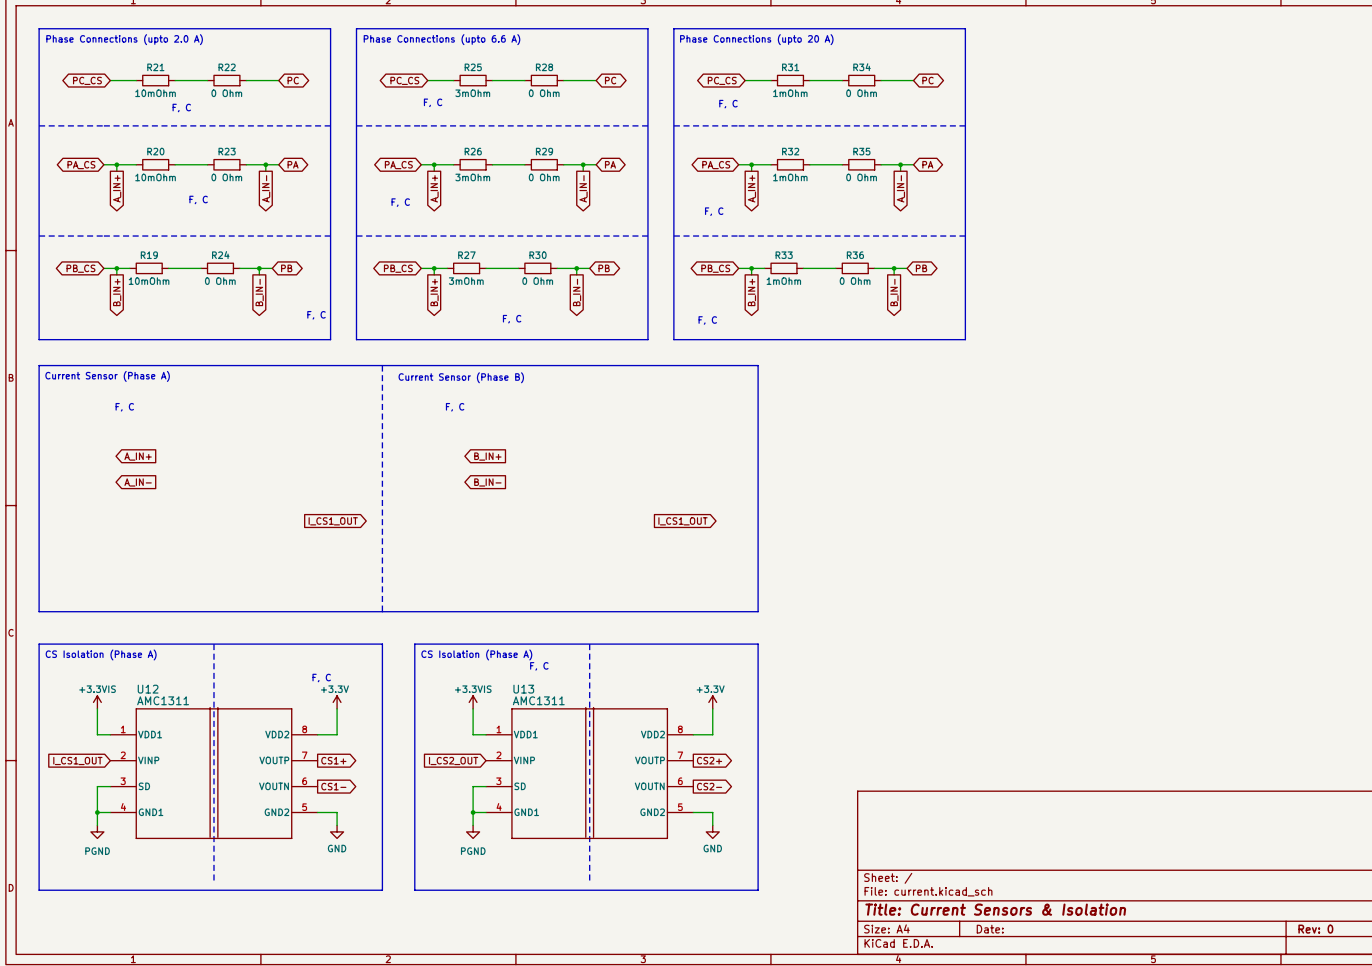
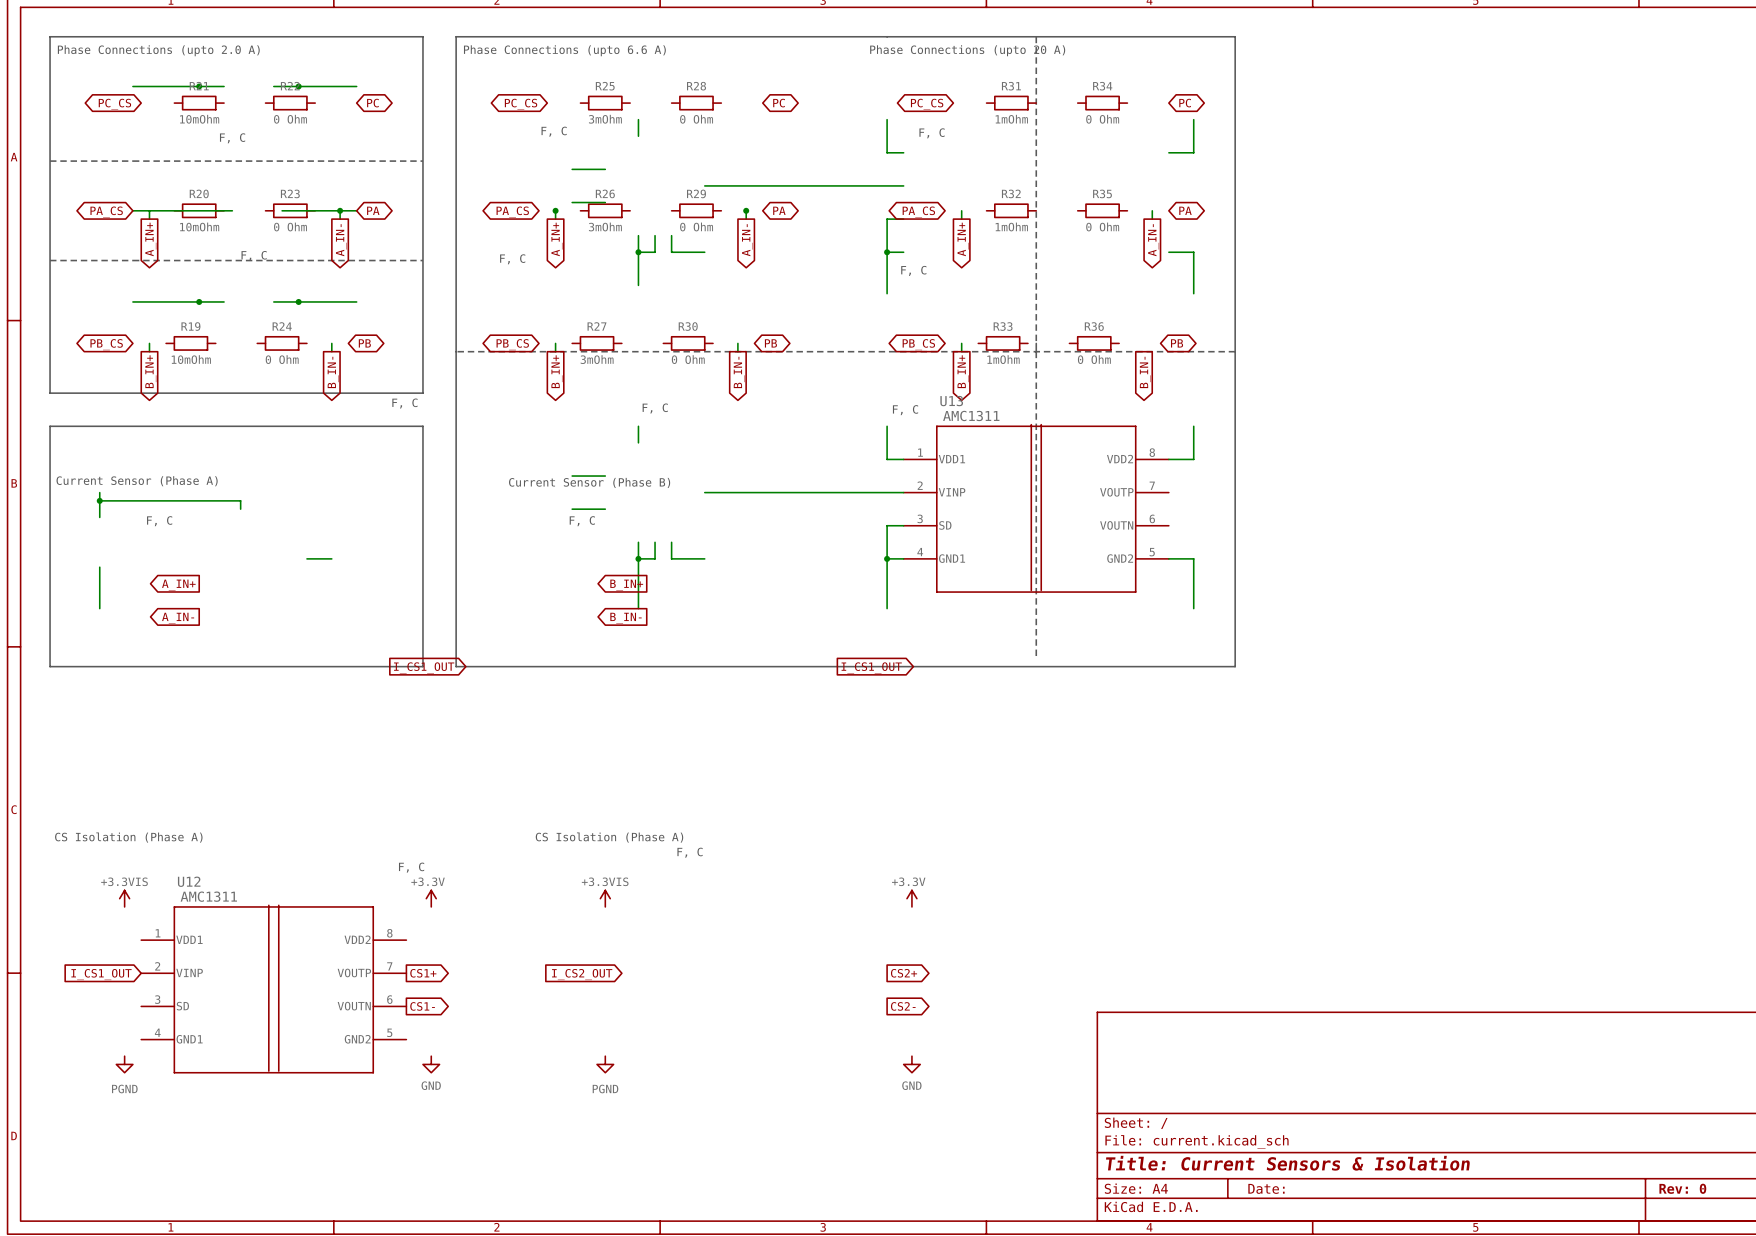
line: (647, 28) (647, 339) (356, 339) -> (829, 36) (862, 36)
line: (673, 28) (673, 339) (965, 339) -> (456, 434) (456, 666) (1235, 666) (1235, 434)
line: none -> (1036, 36) (1036, 658)
wire: none -> (132, 86) (224, 86)
junction: none -> (199, 86)
wire: none -> (273, 86) (356, 86)
junction: none -> (298, 86)
wire: (110, 80) (136, 80) -> none
wire: (175, 80) (207, 80) -> none
wire: (246, 80) (278, 80) -> none
wire: (427, 80) (453, 80) -> (572, 169) (605, 169)
wire: (492, 80) (524, 80) -> none
wire: (563, 80) (596, 80) -> none
wire: (745, 80) (771, 80) -> none
wire: (809, 80) (842, 80) -> none
wire: (881, 80) (913, 80) -> none
wire: none -> (638, 119) (638, 136)
wire: none -> (887, 119) (887, 152) (903, 152)
wire: none -> (1193, 119) (1193, 152) (1168, 152)
line: (356, 125) (647, 125) -> none
line: (673, 125) (965, 125) -> none
wire: none -> (704, 185) (903, 185)
wire: none -> (572, 202) (605, 202)
junction: (116, 164) -> none
wire: none -> (174, 210) (224, 210)
wire: (181, 164) (207, 164) -> (282, 210) (315, 210)
wire: (421, 164) (453, 164) -> none
wire: (492, 164) (524, 164) -> none
wire: (563, 164) (596, 164) -> none
wire: (738, 164) (771, 164) -> none
junction: (751, 164) -> none
wire: (809, 164) (842, 164) -> none
wire: (881, 164) (913, 164) -> none
junction: (900, 164) -> none
wire: none -> (903, 219) (887, 219) (887, 293)
wire: none -> (638, 235) (638, 285)
wire: none -> (655, 235) (655, 252) (638, 252)
wire: none -> (671, 235) (671, 252) (704, 252)
junction: none -> (638, 252)
wire: none -> (887, 252) (903, 252)
junction: none -> (887, 252)
wire: none -> (1168, 252) (1193, 252) (1193, 293)
line: (39, 236) (330, 236) -> (50, 260) (422, 260)
junction: none -> (199, 301)
junction: none -> (298, 301)
line: (356, 236) (647, 236) -> none
line: (673, 236) (965, 236) -> none
wire: (103, 268) (129, 268) -> none
junction: (116, 268) -> none
wire: (168, 268) (201, 268) -> none
wire: (239, 268) (272, 268) -> none
junction: (259, 268) -> none
wire: (421, 268) (447, 268) -> (572, 476) (605, 476)
junction: (434, 268) -> none
wire: (486, 268) (518, 268) -> none
wire: (557, 268) (589, 268) -> none
junction: (576, 268) -> none
wire: (738, 268) (764, 268) -> none
junction: (751, 268) -> none
wire: (803, 268) (835, 268) -> none
wire: (874, 268) (907, 268) -> none
wire: (894, 268) (894, 274) -> none
junction: (894, 268) -> none
line: none -> (456, 351) (1235, 351)
line: (39, 307) (39, 333) -> (50, 393) (422, 393)
line: (330, 307) (330, 333) -> (50, 426) (422, 426)
wire: none -> (638, 426) (638, 442)
wire: none -> (887, 426) (887, 459) (903, 459)
wire: none -> (1193, 426) (1193, 459) (1168, 459)
line: (39, 339) (330, 339) -> (50, 666) (422, 666) (422, 434)
line: (39, 365) (758, 365) (758, 611) (39, 611) (39, 521) -> (50, 467) (50, 434)
line: (382, 365) (382, 611) -> none
wire: none -> (99, 492) (99, 517)
wire: none -> (704, 492) (903, 492)
wire: none -> (99, 500) (240, 500) (240, 509)
junction: none -> (99, 500)
wire: none -> (572, 509) (605, 509)
wire: none -> (903, 525) (887, 525) (887, 608)
wire: none -> (638, 542) (638, 608)
wire: none -> (655, 542) (655, 558) (638, 558)
wire: none -> (671, 542) (671, 558) (704, 558)
wire: none -> (306, 558) (331, 558)
junction: none -> (638, 558)
wire: none -> (887, 558) (903, 558)
junction: none -> (887, 558)
wire: none -> (1168, 558) (1193, 558) (1193, 608)
wire: none -> (99, 567) (99, 608)
line: (39, 644) (382, 644) (382, 890) (39, 890) (39, 644) -> none
line: (213, 644) (213, 883) -> none
line: (414, 644) (758, 644) (758, 890) (414, 890) (414, 644) -> none
line: (589, 644) (589, 883) -> none
wire: (97, 708) (97, 734) (110, 734) -> none
wire: (337, 708) (337, 734) (317, 734) -> none
wire: (473, 708) (473, 734) (486, 734) -> none
wire: (712, 708) (712, 734) (693, 734) -> none
U13 position: (589, 772) -> (1036, 508)
wire: (110, 786) (97, 786) (97, 825) -> none
wire: (486, 786) (473, 786) (473, 825) -> none
wire: (97, 812) (110, 812) -> none
junction: (97, 812) -> none
wire: (317, 812) (337, 812) (337, 825) -> none
wire: (473, 812) (486, 812) -> none
junction: (473, 812) -> none
wire: (693, 812) (712, 812) (712, 825) -> none

